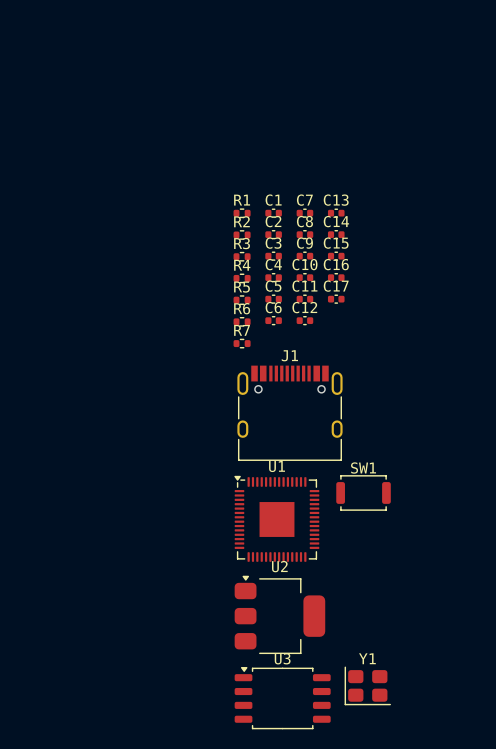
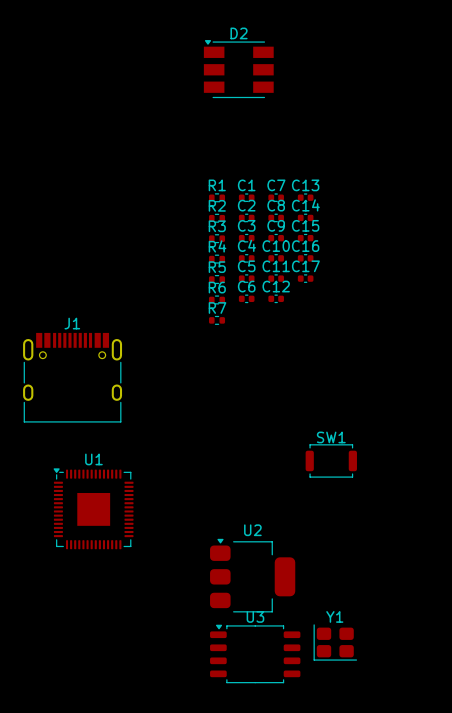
D2: none -> (238, 69)
J1 position: (289, 413) -> (72, 377)
U1 position: (276, 518) -> (93, 508)

